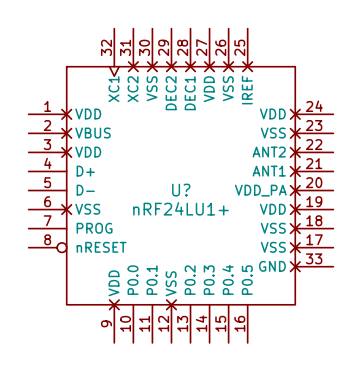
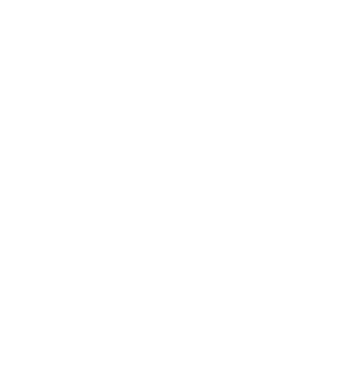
U?: nRF24LU1+ (180, 185) -> none

